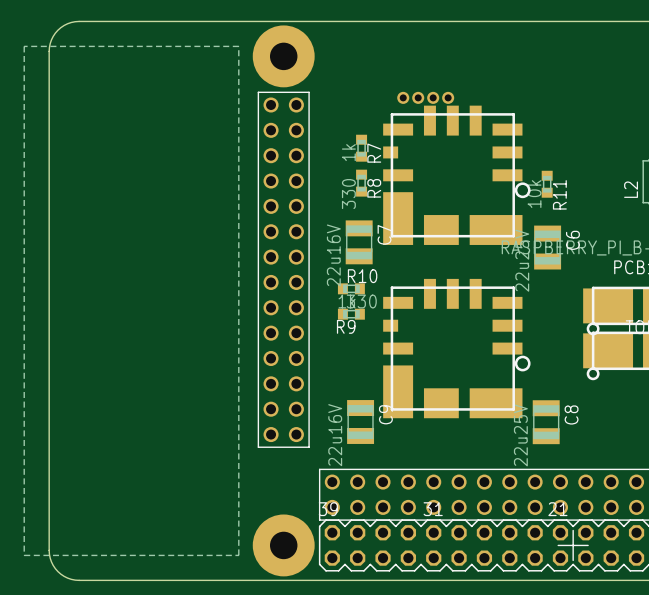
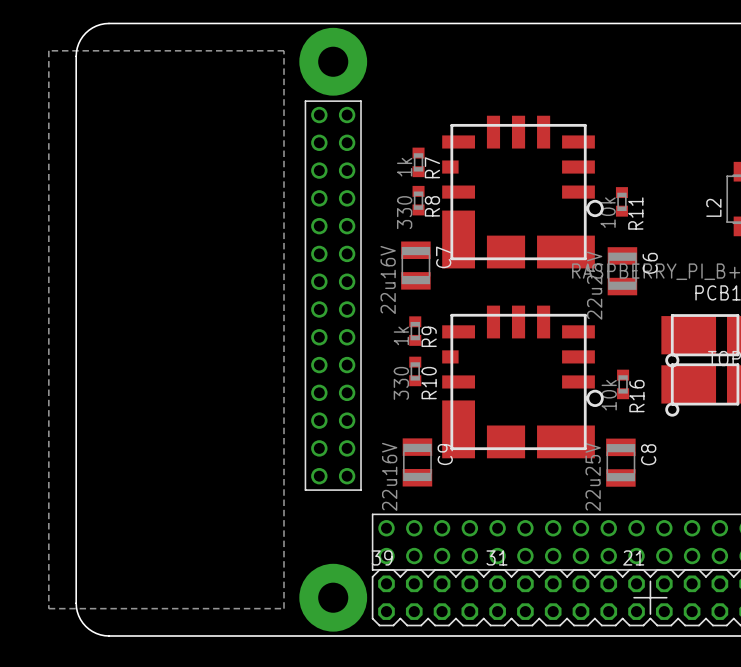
part: (425, 97) -> none
R10 rotation: 0° (351, 288) -> 90° clockwise (415, 371)
R10 position: (351, 288) -> (415, 371)
R9 rotation: 0° (351, 314) -> 90° clockwise (415, 331)
R9 name position: R9 (346, 326) -> R9 (429, 336)
R16: none -> 10k (623, 384)

